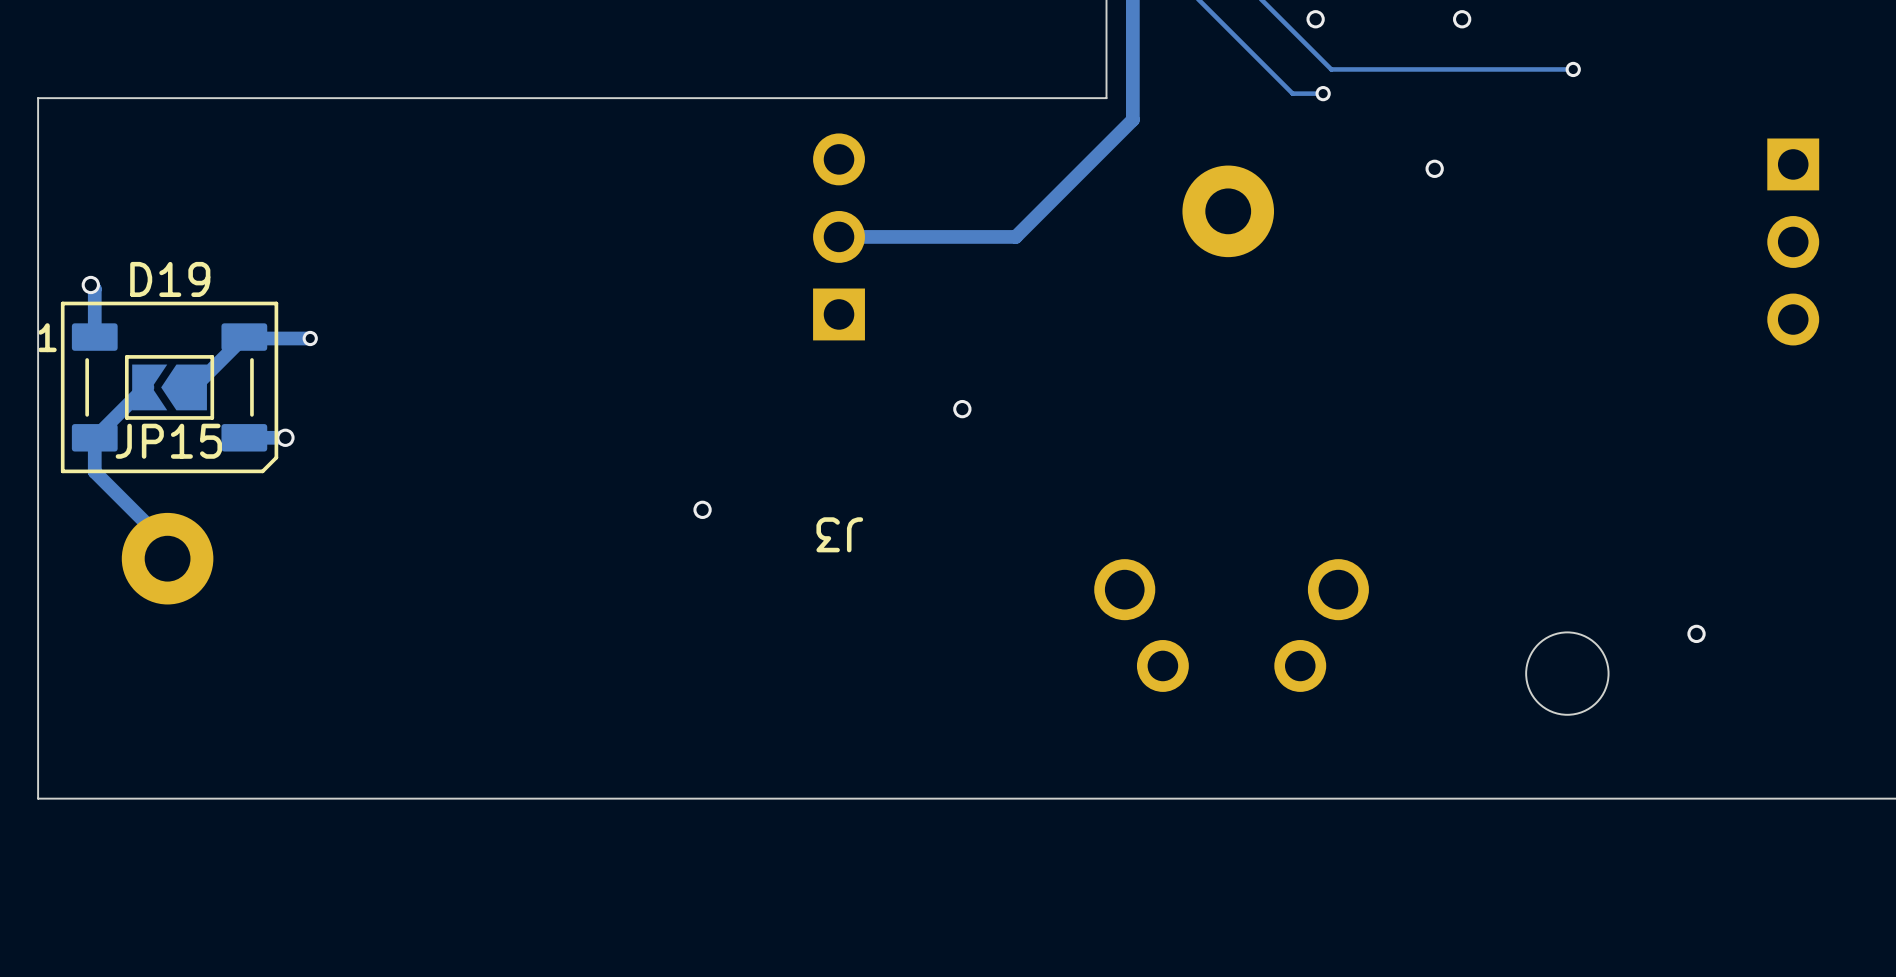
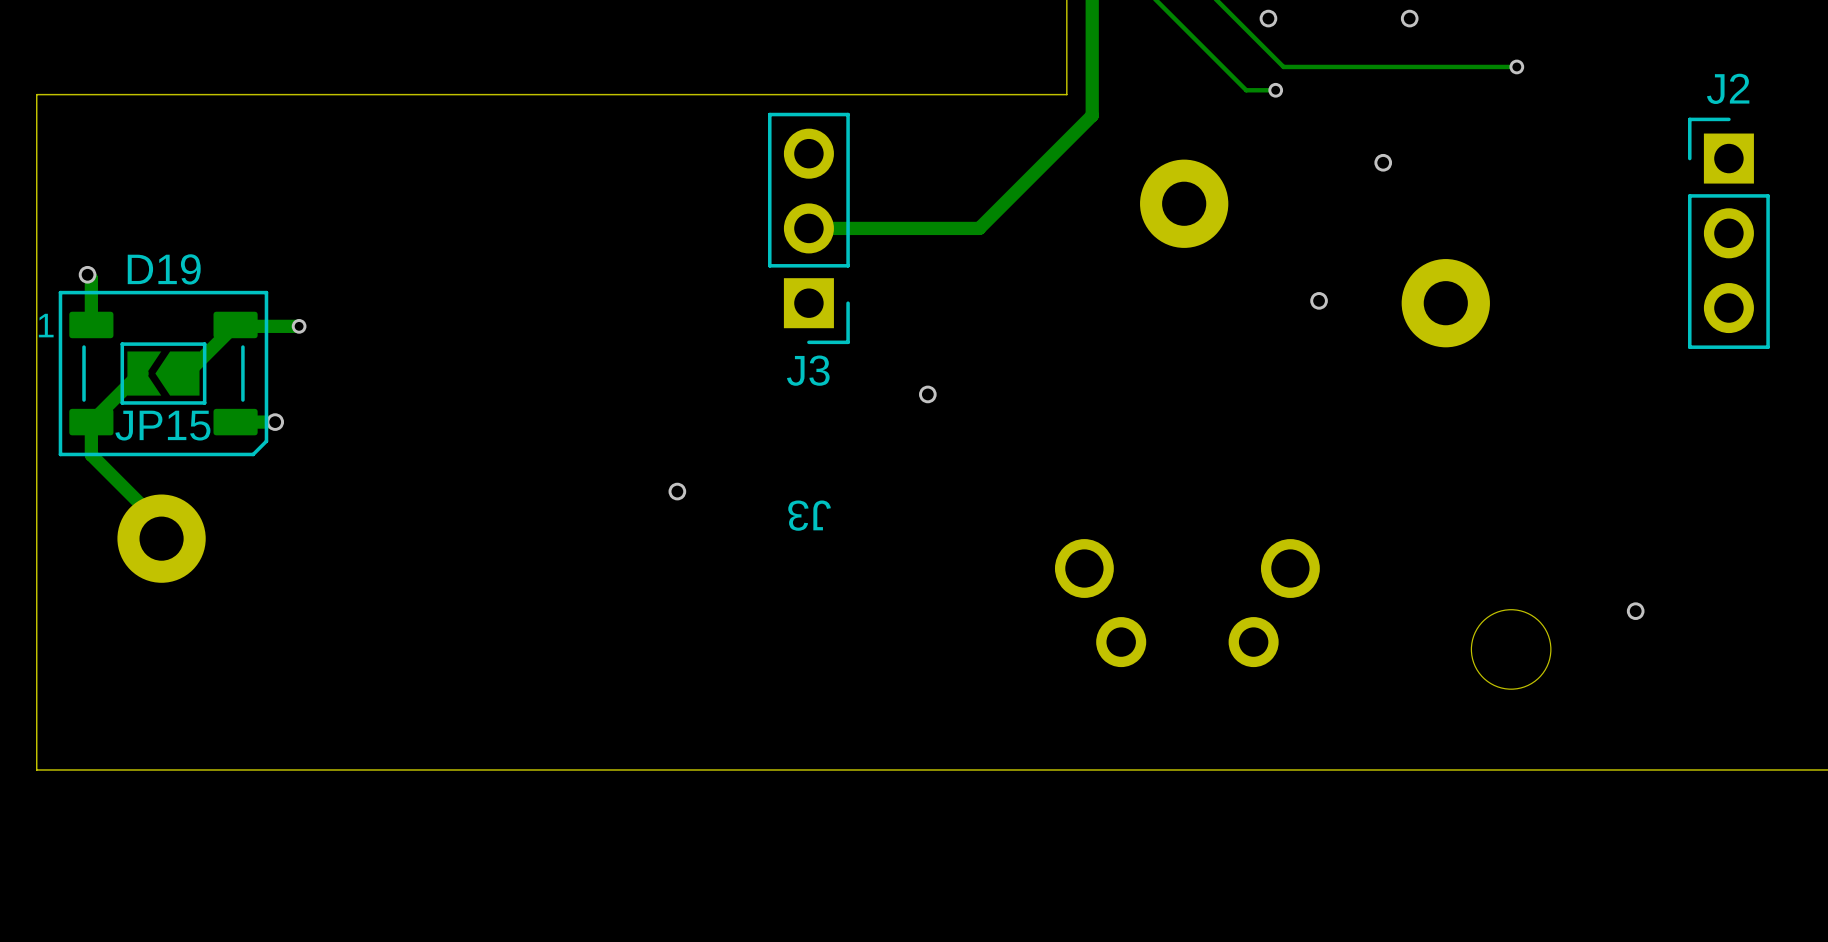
J3 side: top (839, 236) -> bottom (808, 228)
J2 side: top (1793, 241) -> bottom (1728, 233)
via: none -> (1319, 300)
part: none -> (1445, 303)

